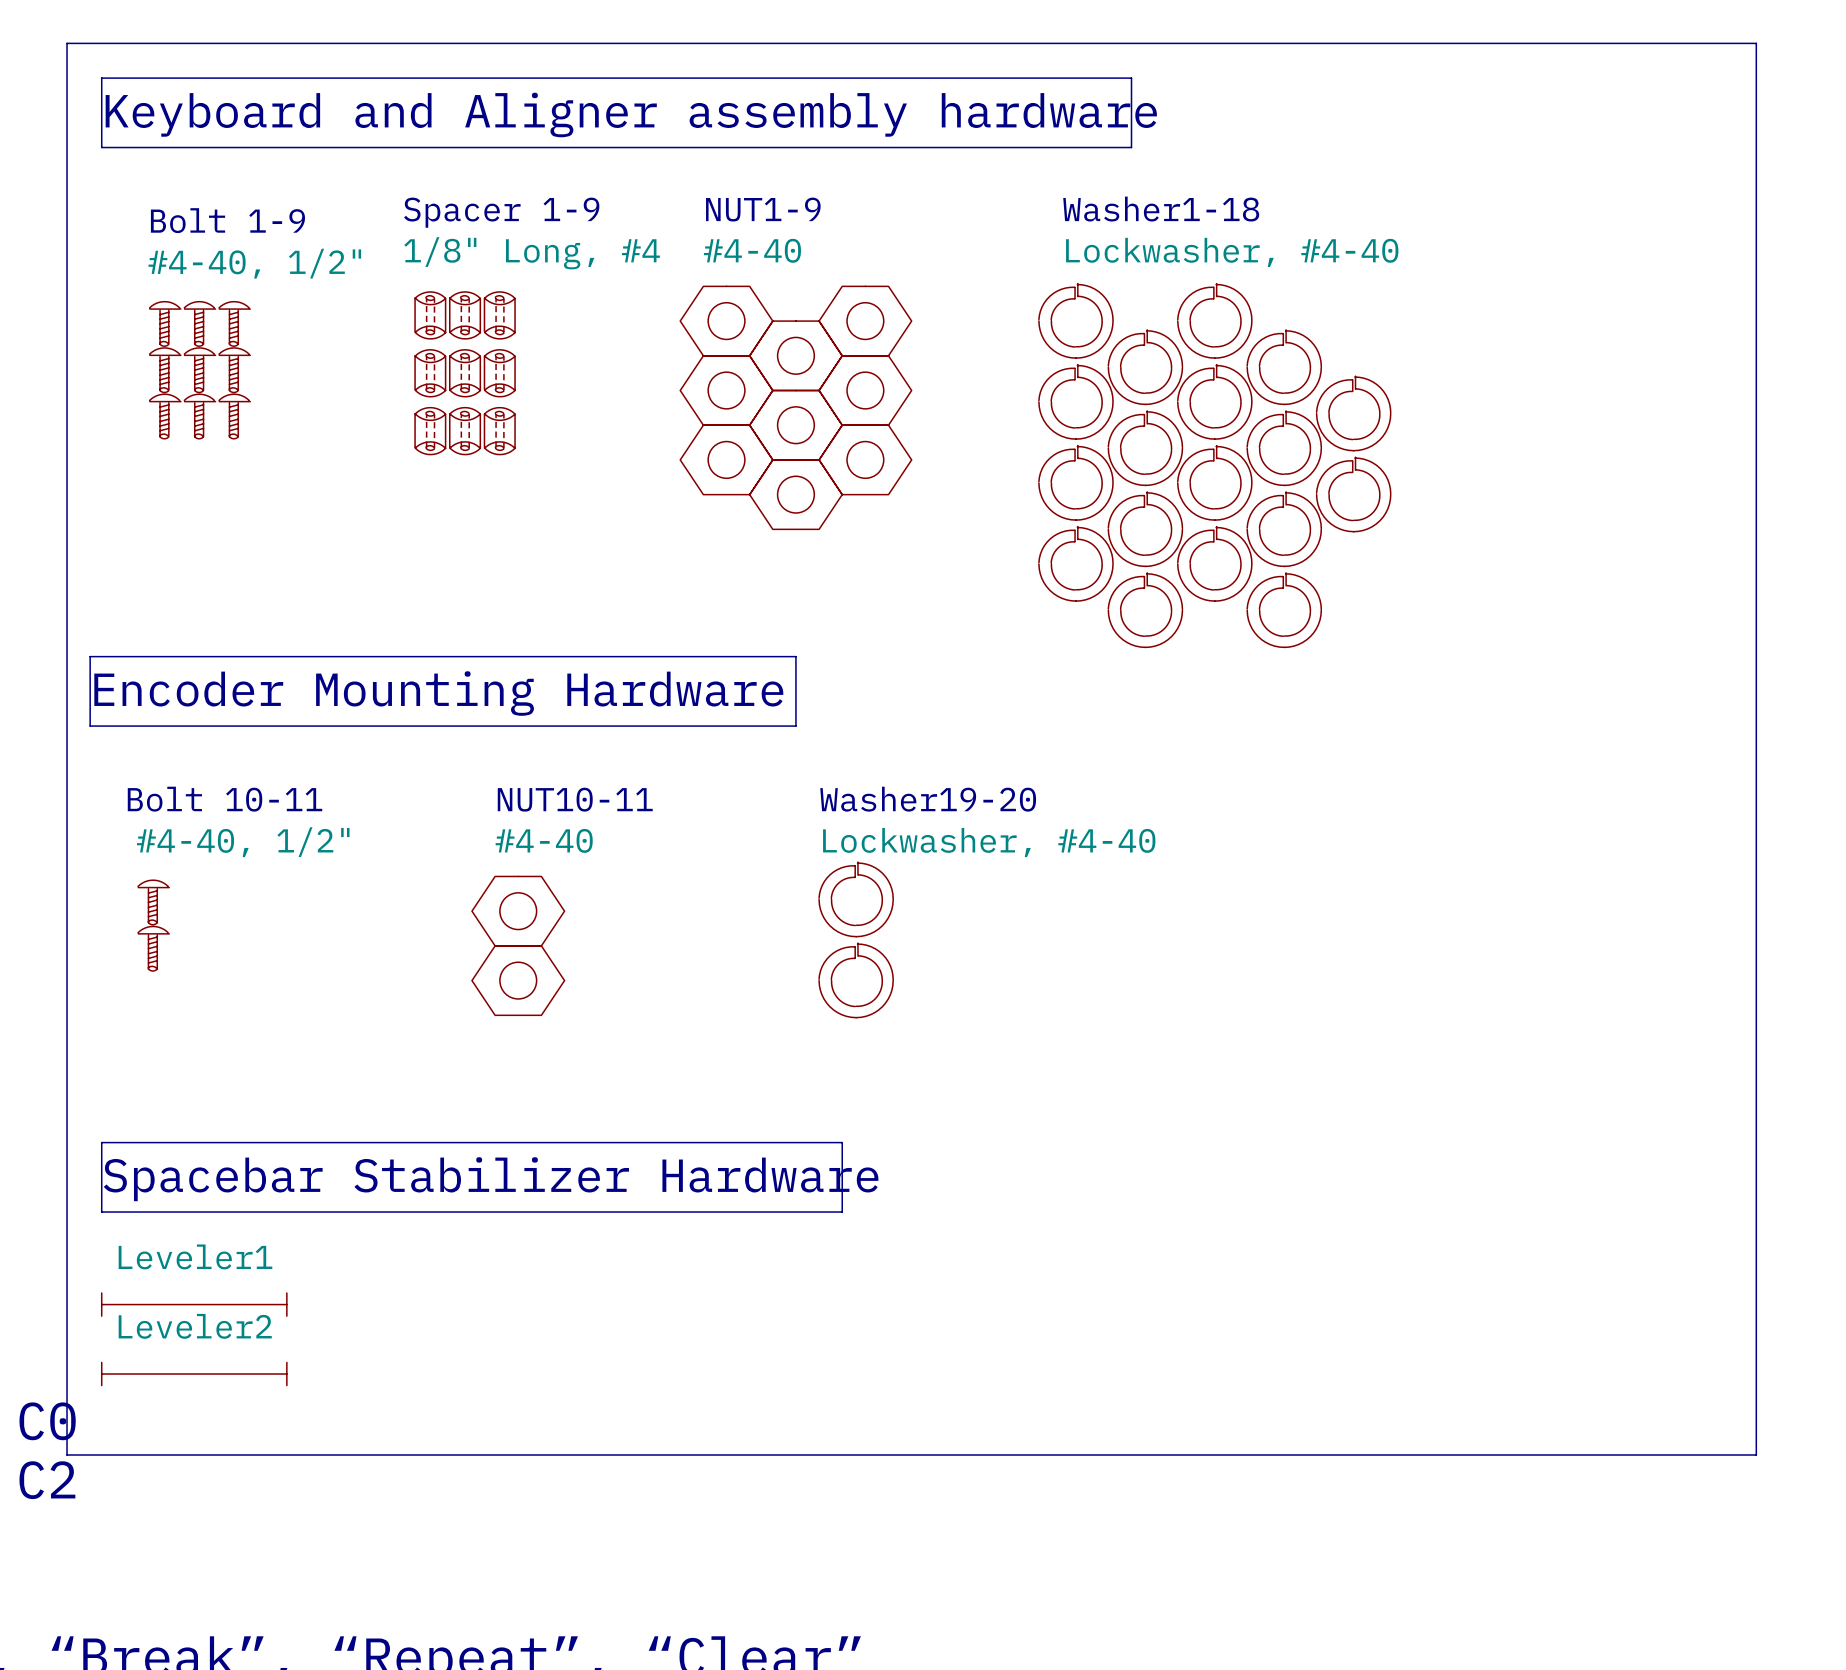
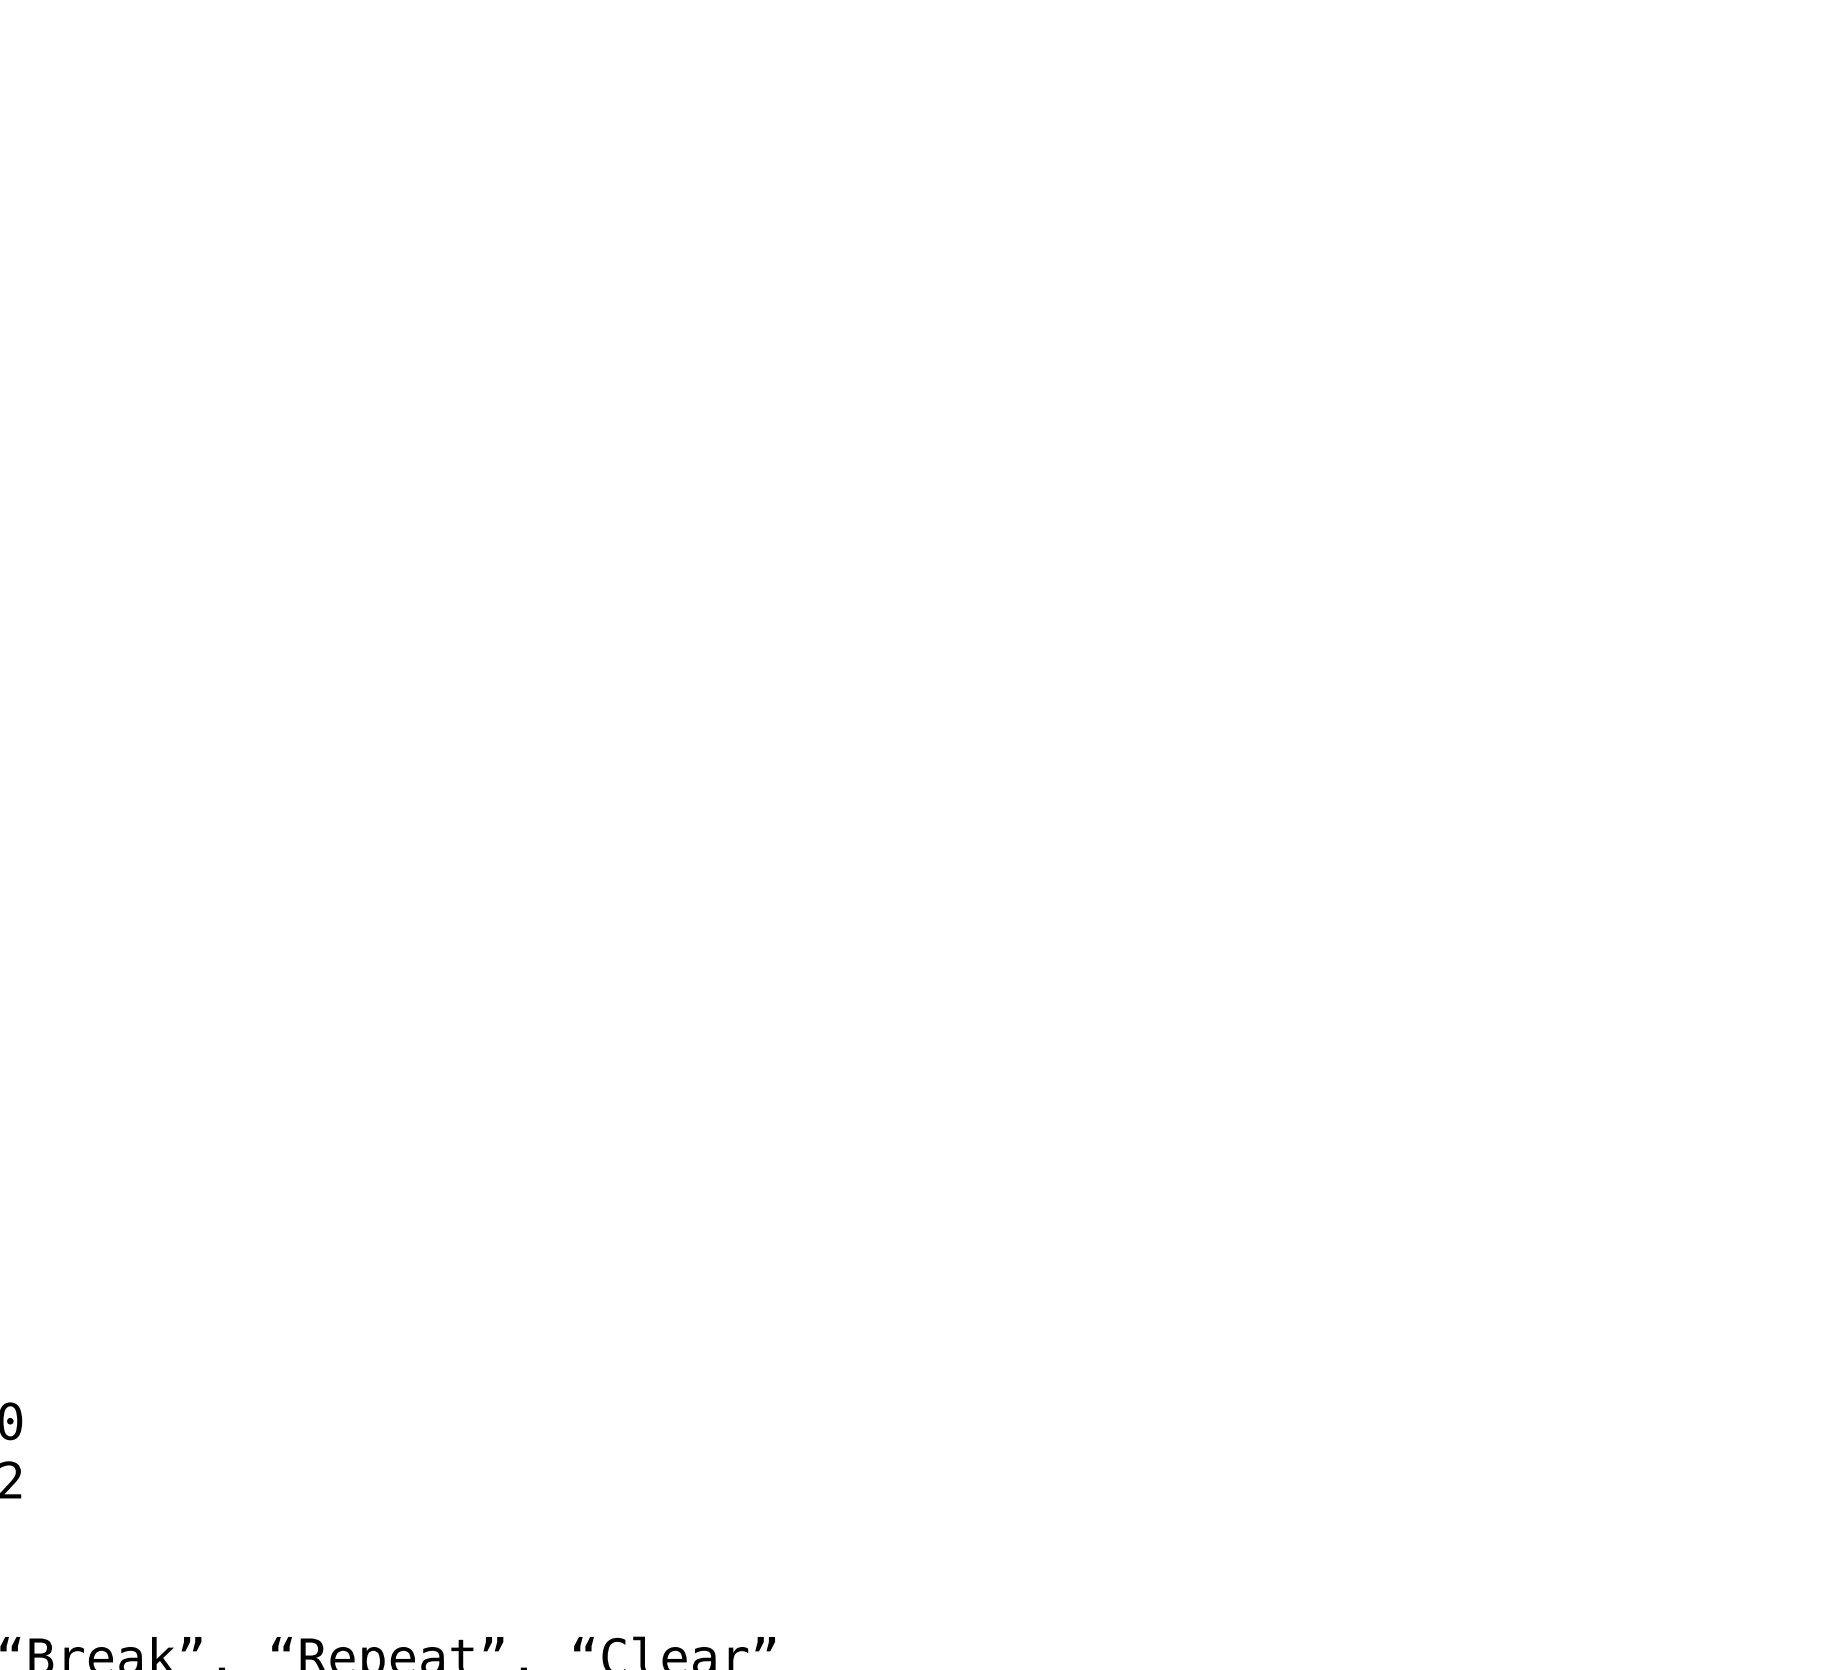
line: (67, 43) (1756, 43) (1756, 1454) (67, 1454) (67, 43) -> none
line: (101, 78) (1131, 78) (1131, 147) (101, 147) (101, 78) -> none
text: Keyboard and Aligner assembly hardware (631, 114) -> none
text: NUT1-9 (763, 209) -> none
text: Washer1-18 (1161, 209) -> none
text: Spacer 1-9 (501, 212) -> none
text: Bolt 1-9 (227, 220) -> none
part: (430, 315) -> none
part: (465, 315) -> none
part: (499, 315) -> none
part: (1075, 320) -> none
part: (1214, 320) -> none
part: (726, 321) -> none
part: (865, 321) -> none
part: (165, 323) -> none
part: (199, 323) -> none
part: (234, 323) -> none
part: (795, 355) -> none
part: (1145, 367) -> none
part: (1284, 367) -> none
part: (165, 370) -> none
part: (199, 370) -> none
part: (234, 370) -> none
part: (430, 373) -> none
part: (465, 373) -> none
part: (499, 373) -> none
part: (726, 390) -> none
part: (865, 390) -> none
part: (1075, 401) -> none
part: (1214, 401) -> none
part: (1353, 413) -> none
part: (165, 416) -> none
part: (199, 416) -> none
part: (234, 416) -> none
part: (795, 425) -> none
part: (430, 431) -> none
part: (465, 431) -> none
part: (499, 431) -> none
part: (1145, 448) -> none
part: (1284, 448) -> none
part: (726, 459) -> none
part: (865, 459) -> none
part: (1075, 482) -> none
part: (1214, 482) -> none
part: (795, 494) -> none
part: (1353, 494) -> none
part: (1145, 529) -> none
part: (1284, 529) -> none
part: (1075, 563) -> none
part: (1214, 563) -> none
part: (1145, 610) -> none
part: (1284, 610) -> none
line: (90, 656) (795, 656) (795, 726) (90, 726) (90, 656) -> none
text: Encoder Mounting Hardware (438, 693) -> none
text: Bolt 10-11 (225, 799) -> none
text: NUT10-11 (575, 799) -> none
text: Washer19-20 (928, 799) -> none
part: (856, 899) -> none
part: (153, 902) -> none
part: (518, 911) -> none
part: (153, 948) -> none
part: (518, 980) -> none
part: (856, 980) -> none
line: (101, 1142) (101, 1212) (842, 1212) (842, 1142) (101, 1142) -> none
text: Spacebar Stabilizer Hardware (491, 1179) -> none
Leveler1: (194, 1304) -> none
Leveler2: (194, 1374) -> none

